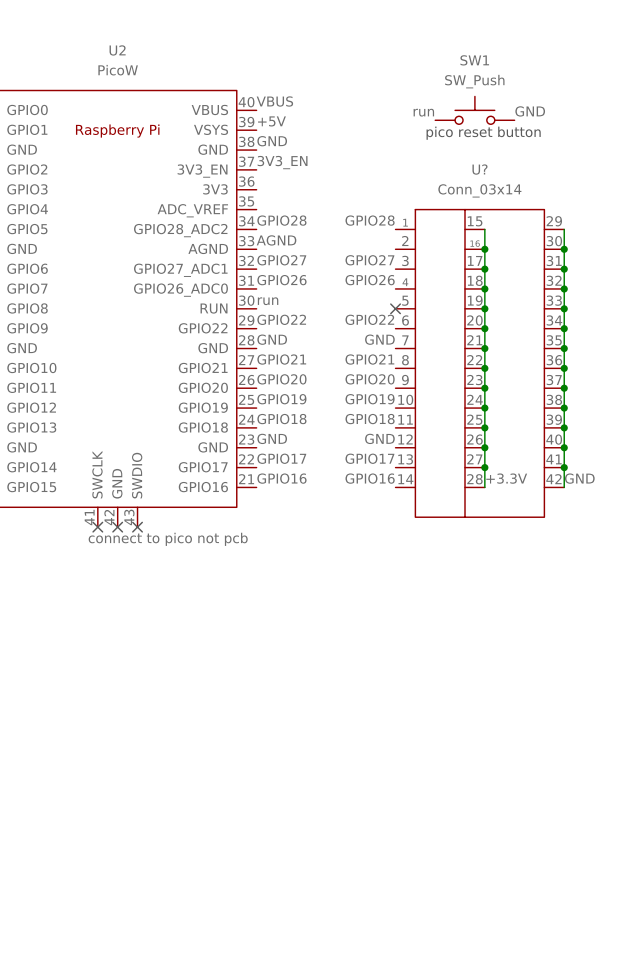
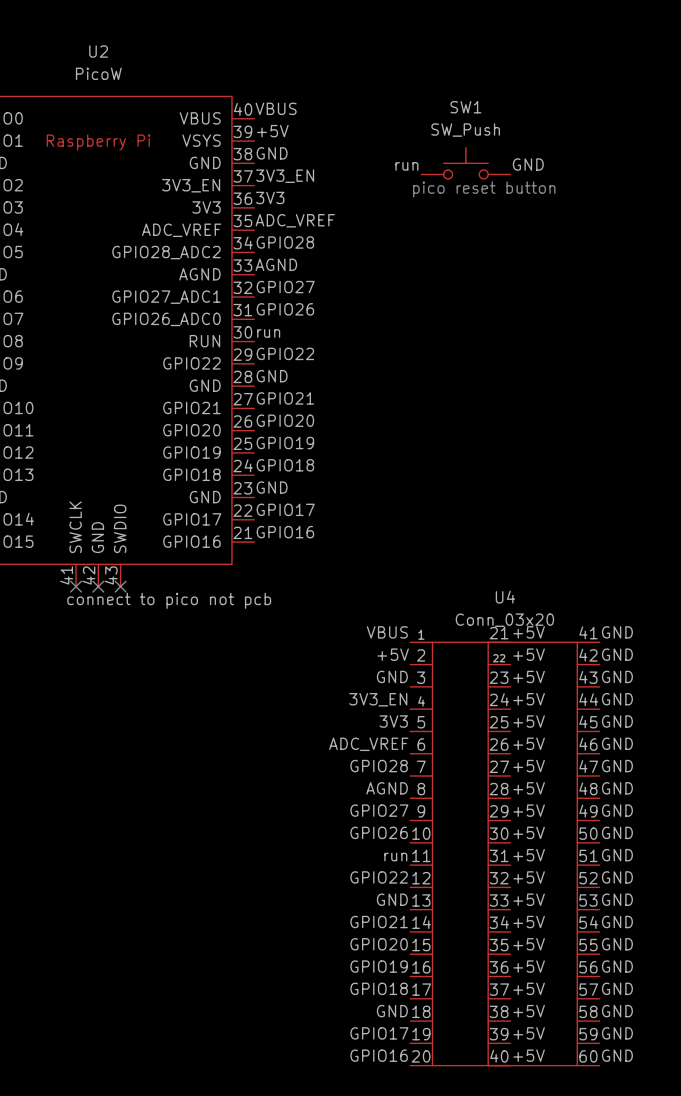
SW1 position: (474, 110) -> (465, 163)
label position: GND (530, 111) -> GND (528, 164)
label position: run (423, 112) -> run (406, 166)
text position: pico reset button (483, 133) -> pico reset button (484, 189)
label: none -> 3V3 (270, 197)
label: none -> ADC_VREF (295, 220)
label: GPIO28 (370, 220) -> none
wire: (484, 229) (484, 487) -> none
wire: (564, 229) (564, 487) -> none
junction: (484, 249) -> none
junction: (564, 249) -> none
label: GPIO27 (369, 260) -> none
junction: (484, 269) -> none
junction: (564, 269) -> none
label: GPIO26 (370, 280) -> none
junction: (484, 288) -> none
junction: (564, 288) -> none
no-connect mark: (395, 308) -> none
junction: (484, 308) -> none
junction: (564, 308) -> none
label: GPIO22 (369, 319) -> none
junction: (484, 328) -> none
junction: (564, 328) -> none
label: GND (379, 339) -> none
junction: (484, 348) -> none
junction: (564, 348) -> none
label: GPIO21 (369, 359) -> none
U?: Conn_03x14 (479, 363) -> none
junction: (484, 368) -> none
junction: (564, 368) -> none
label: GPIO20 (370, 379) -> none
junction: (484, 388) -> none
junction: (564, 388) -> none
label: GPIO19 (370, 399) -> none
junction: (484, 408) -> none
junction: (564, 408) -> none
label: GPIO18 (370, 419) -> none
junction: (484, 427) -> none
junction: (564, 427) -> none
label: GND (379, 438) -> none
junction: (484, 447) -> none
junction: (564, 447) -> none
label: GPIO17 (369, 458) -> none
junction: (484, 467) -> none
junction: (564, 467) -> none
label: GPIO16 (370, 478) -> none
label: +3.3V (506, 478) -> none
label: GND (579, 478) -> none
label: none -> VBUS (387, 632)
label: none -> +5V (529, 632)
label: none -> GND (617, 632)
label: none -> +5V (393, 654)
label: none -> +5V (529, 654)
label: none -> GND (617, 654)
label: none -> GND (392, 676)
label: none -> +5V (529, 676)
label: none -> GND (617, 676)
label: none -> +5V (529, 699)
label: none -> GND (617, 699)
label: none -> 3V3_EN (378, 699)
label: none -> 3V3 (393, 721)
label: none -> +5V (529, 721)
label: none -> GND (617, 721)
label: none -> +5V (529, 743)
label: none -> GND (617, 743)
label: none -> ADC_VREF (368, 744)
label: none -> GPIO28 (379, 766)
label: none -> GND (617, 766)
label: none -> +5V (529, 766)
label: none -> AGND (387, 788)
label: none -> +5V (529, 788)
label: none -> GND (617, 788)
label: none -> GPIO27 (379, 810)
label: none -> +5V (529, 810)
label: none -> GND (617, 810)
label: none -> GPIO26 (379, 832)
label: none -> +5V (529, 832)
label: none -> GND (617, 832)
U4: none -> Conn_03x20 (504, 853)
label: none -> +5V (529, 855)
label: none -> GND (617, 855)
label: none -> run (395, 857)
label: none -> GPIO22 (379, 877)
label: none -> +5V (529, 877)
label: none -> GND (617, 877)
label: none -> GND (392, 899)
label: none -> +5V (529, 899)
label: none -> GND (617, 899)
label: none -> GPIO21 (379, 922)
label: none -> GND (617, 922)
label: none -> +5V (529, 922)
label: none -> GPIO20 (379, 944)
label: none -> +5V (529, 944)
label: none -> GND (617, 944)
label: none -> GPIO19 (379, 966)
label: none -> +5V (529, 966)
label: none -> GND (617, 966)
label: none -> GPIO18 (379, 988)
label: none -> +5V (529, 988)
label: none -> GND (617, 988)
label: none -> GND (392, 1011)
label: none -> +5V (529, 1011)
label: none -> GND (617, 1011)
label: none -> GPIO17 (379, 1033)
label: none -> +5V (529, 1033)
label: none -> GND (617, 1033)
label: none -> GPIO16 (379, 1055)
label: none -> +5V (529, 1055)
label: none -> GND (617, 1055)

